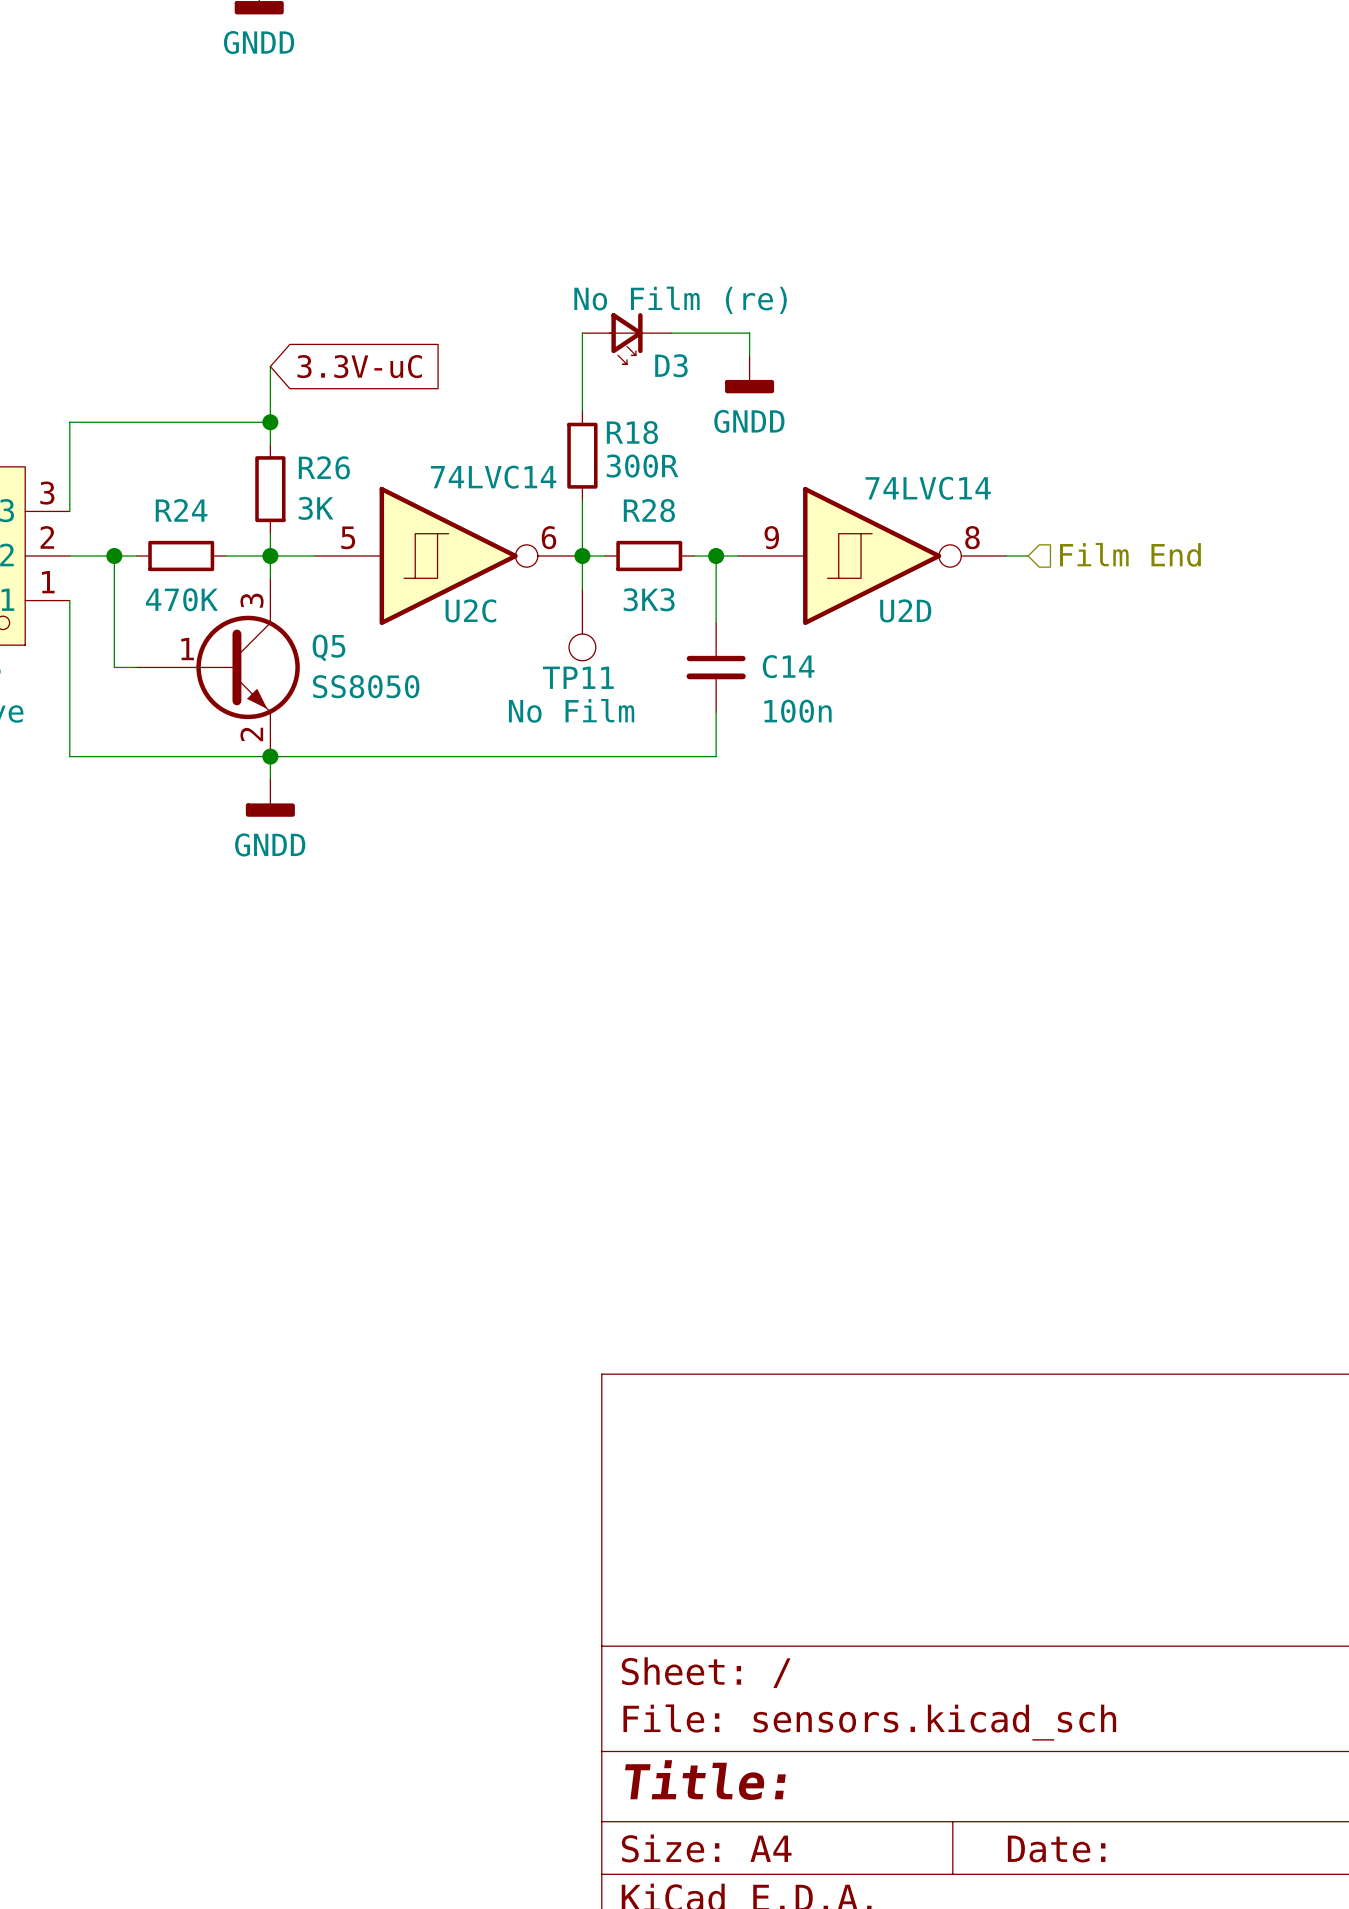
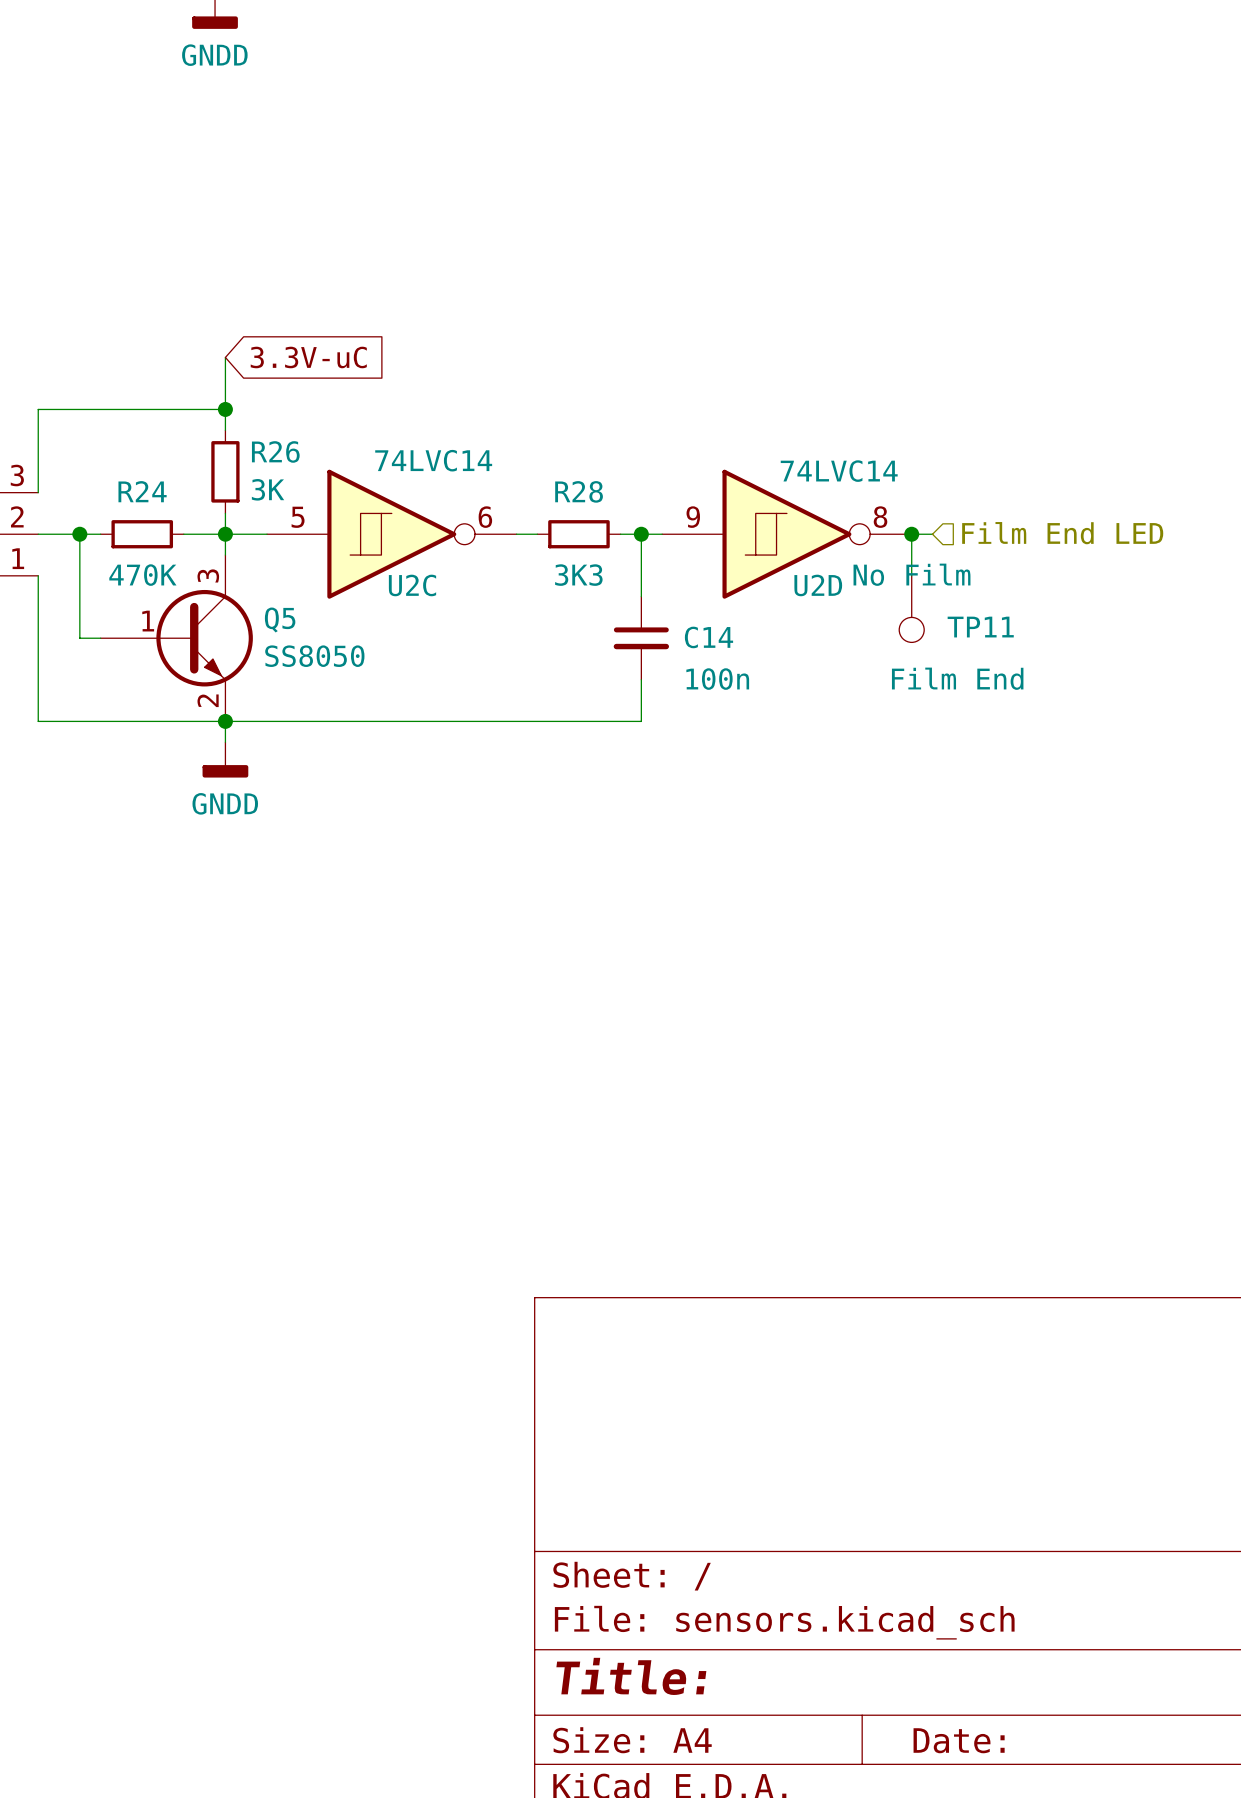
wire: (582, 333) (582, 411) -> none
wire: (671, 333) (749, 333) (749, 355) -> none
D3: No Film (re) (626, 338) -> none
power symbol: GNDD (749, 374) -> none
R18: 300R (582, 455) -> none
wire: (582, 500) (582, 589) -> none
hierarchical label: Film End (1130, 554) -> Film End LED (1062, 533)
junction: (582, 556) -> none
wire: none -> (911, 534) (911, 575)
junction: none -> (911, 534)
TP11 position: (582, 625) -> (911, 609)
TP11 name position: TP11 (578, 677) -> TP11 (980, 627)
TP11 text position: No Film (571, 710) -> No Film (911, 574)
TP11 value: none -> Film End (957, 678)

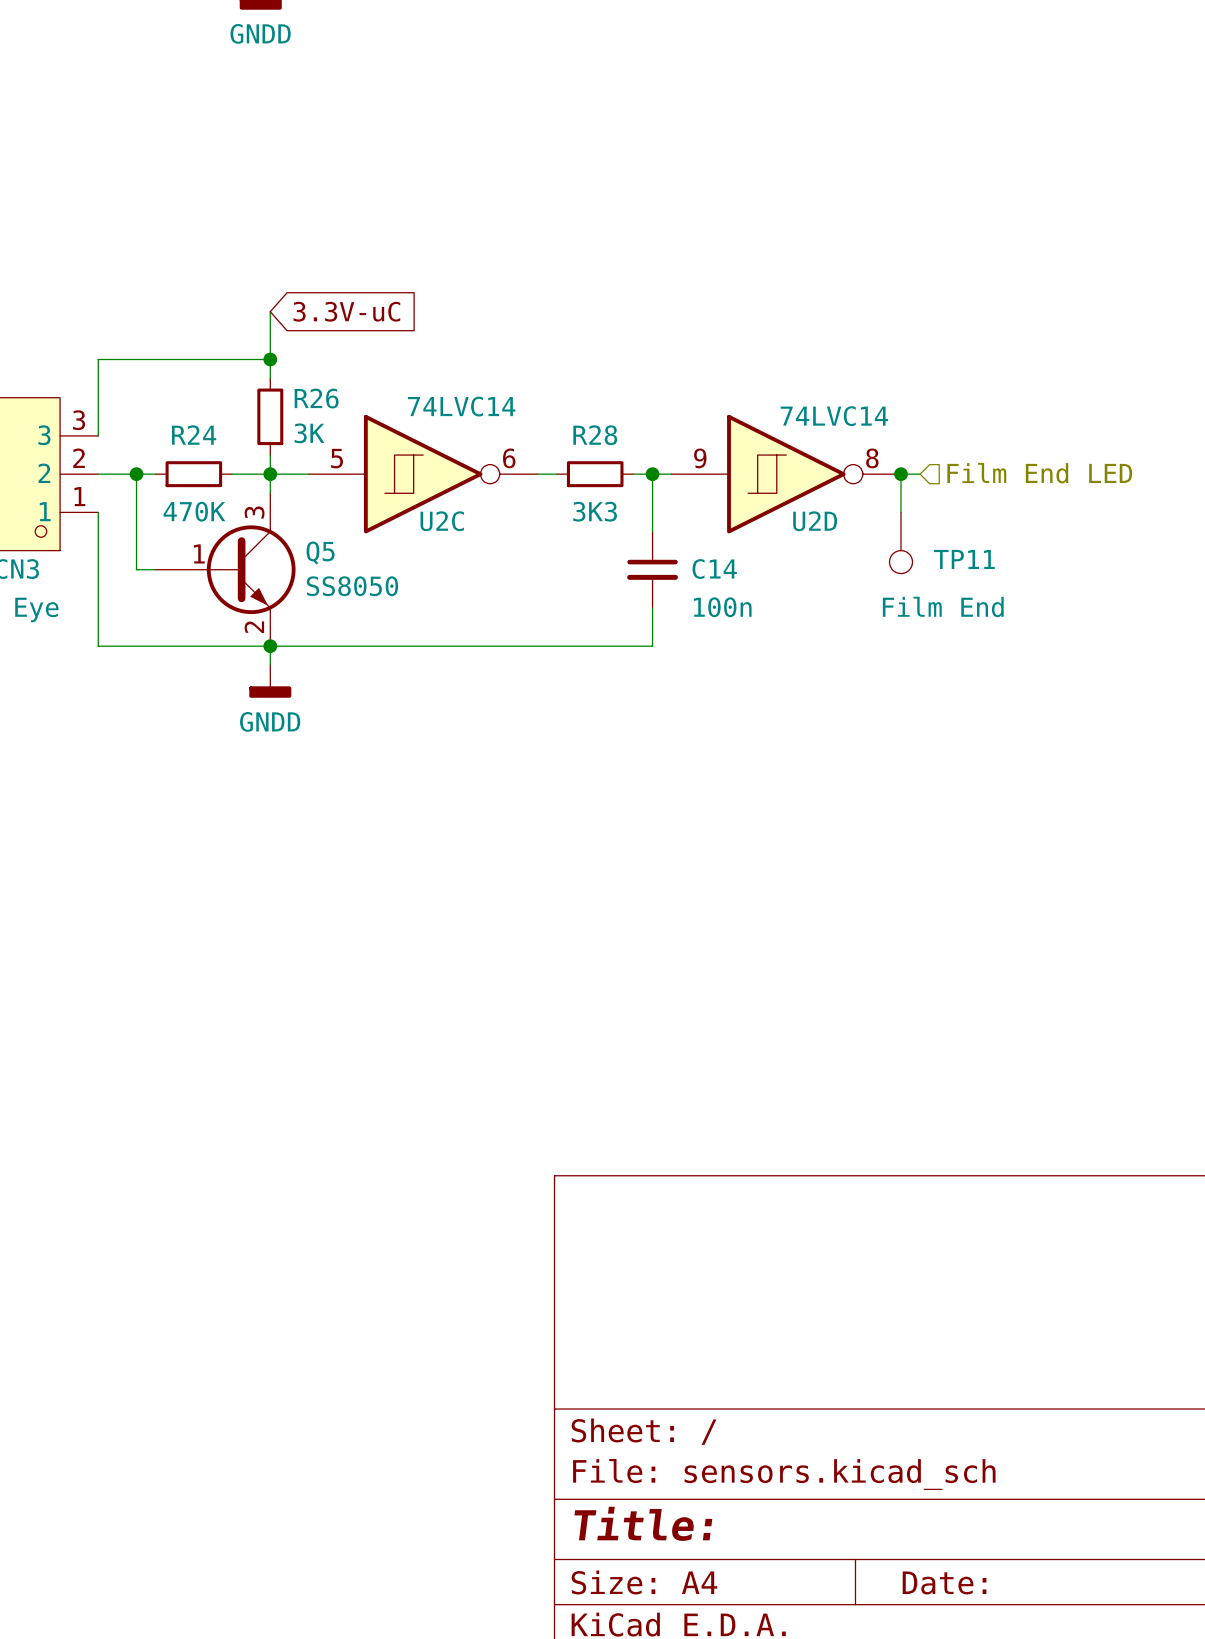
TP11 text: No Film (911, 574) -> none

